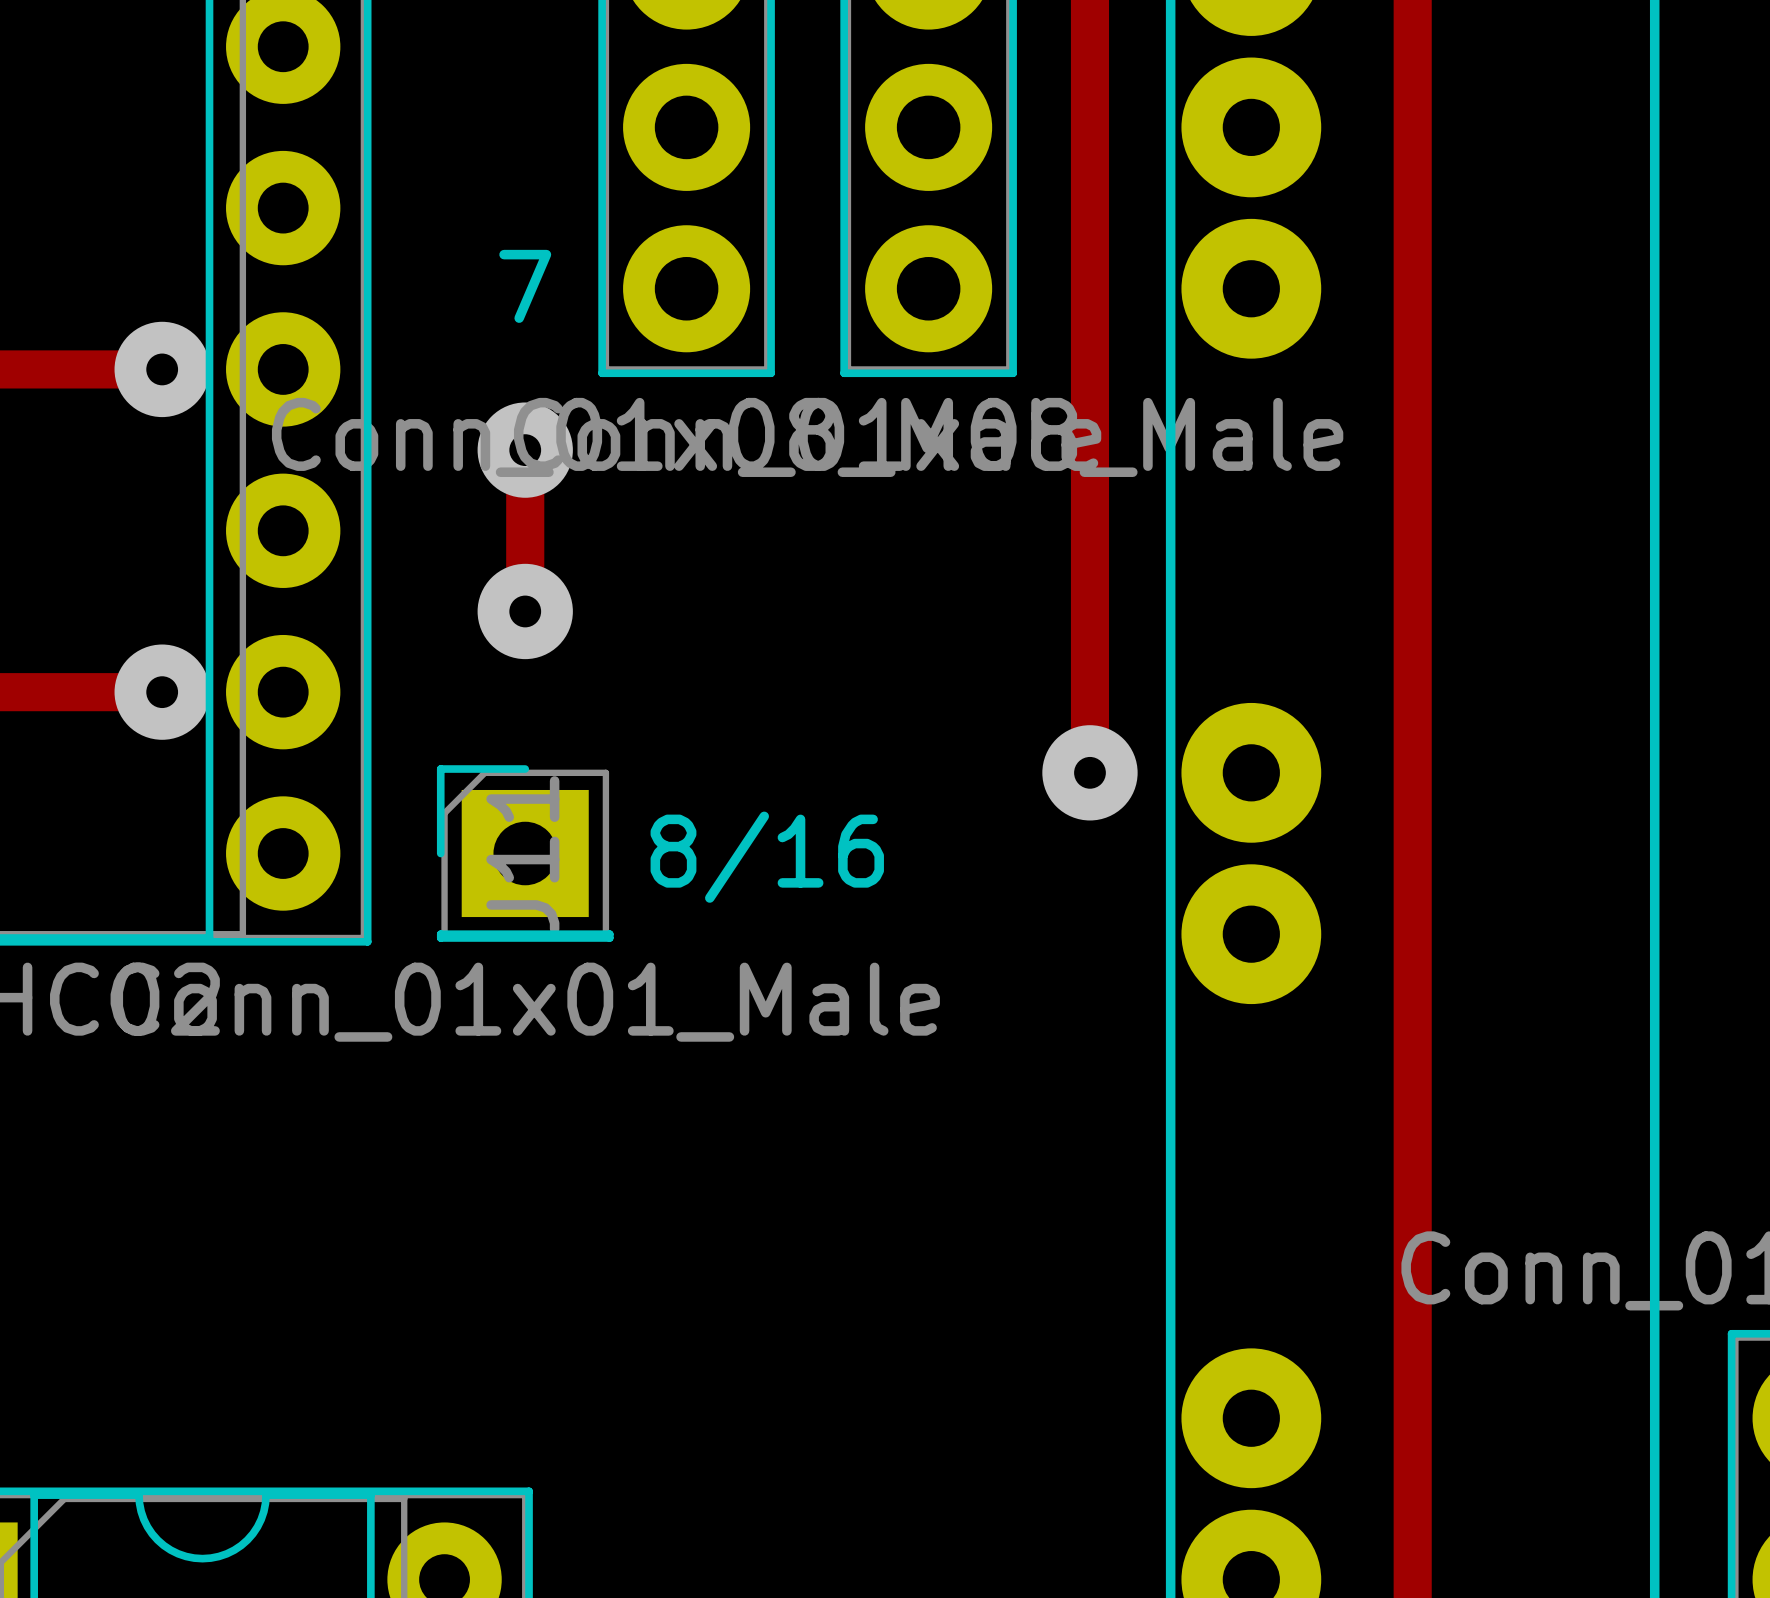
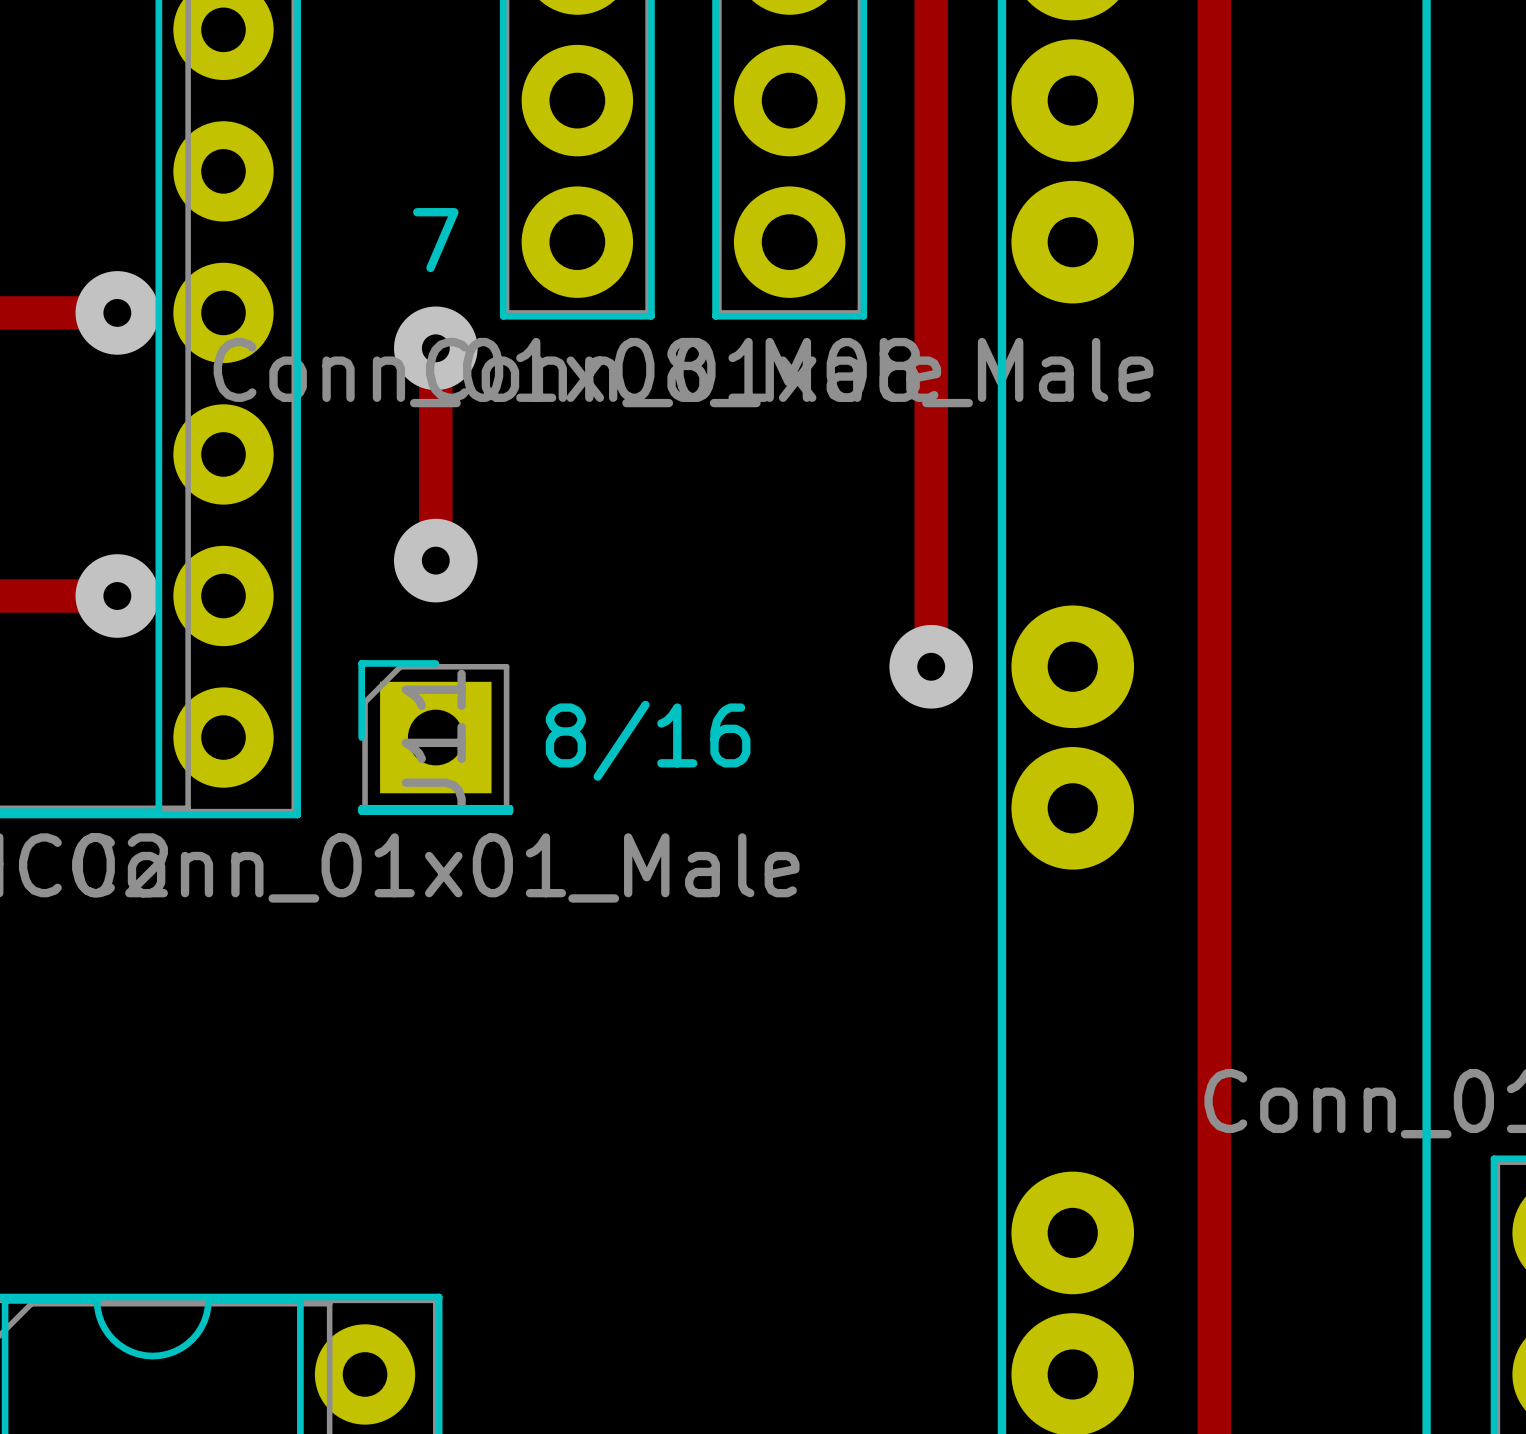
via position: (525, 450) -> (435, 348)
via position: (525, 611) -> (435, 560)

